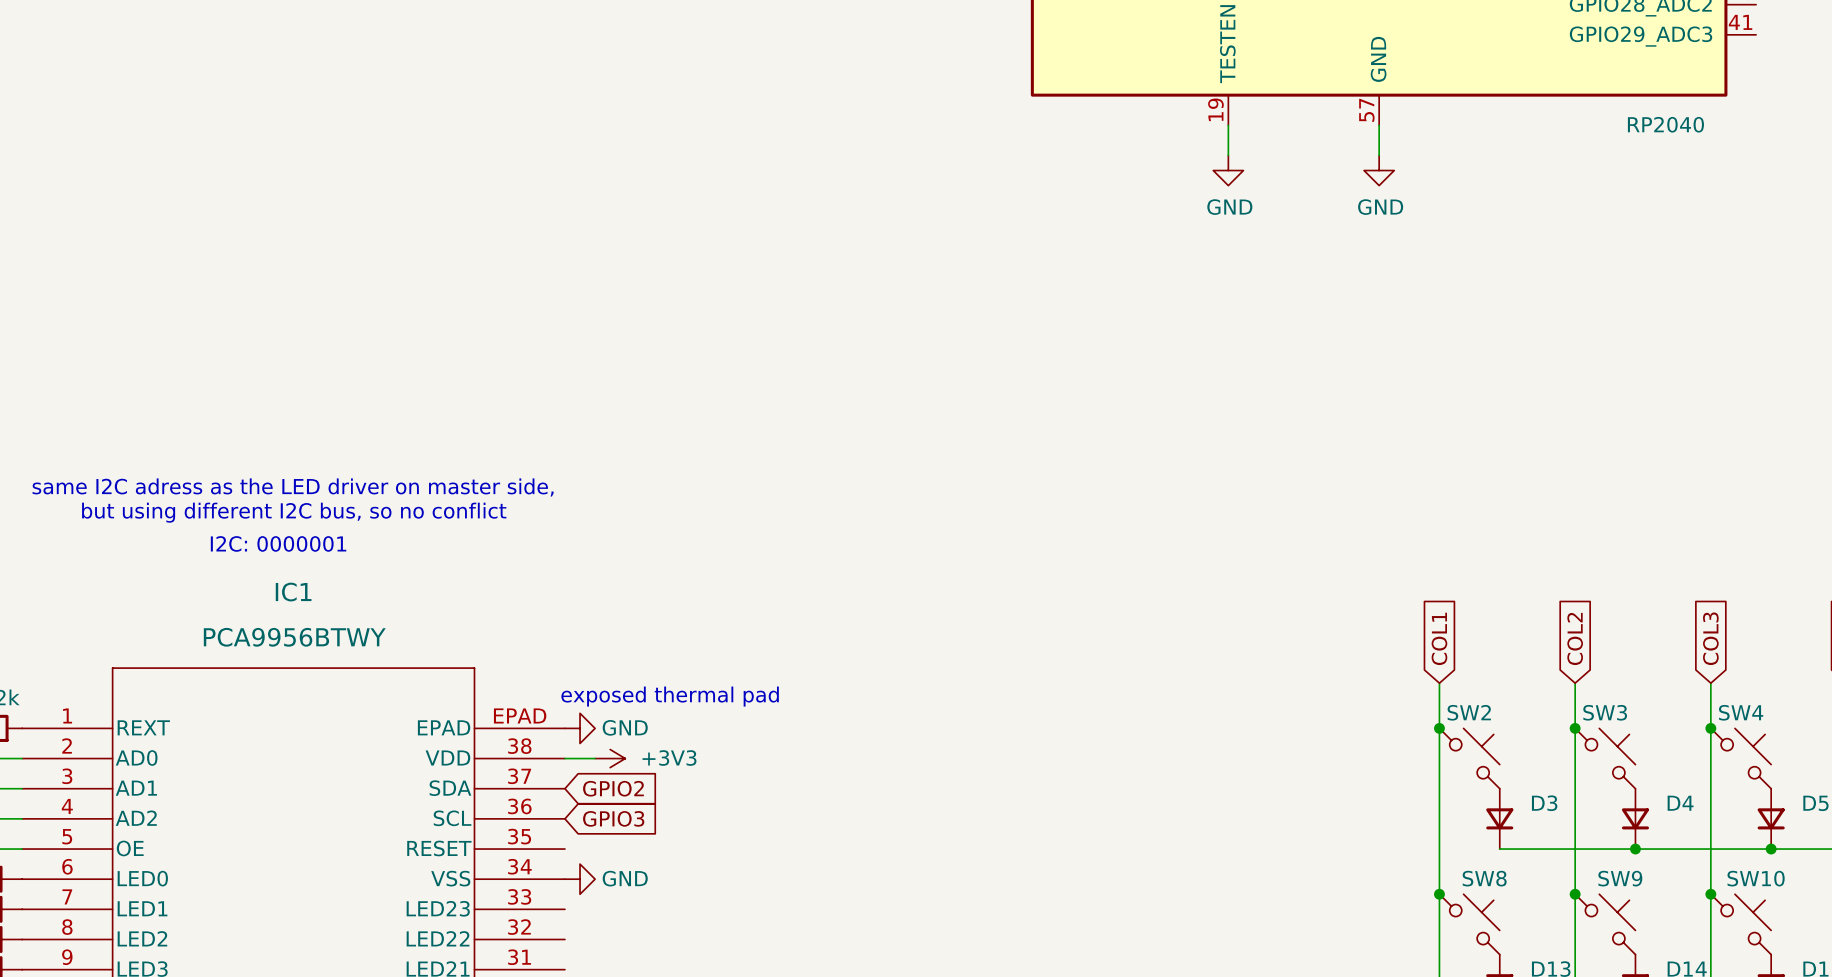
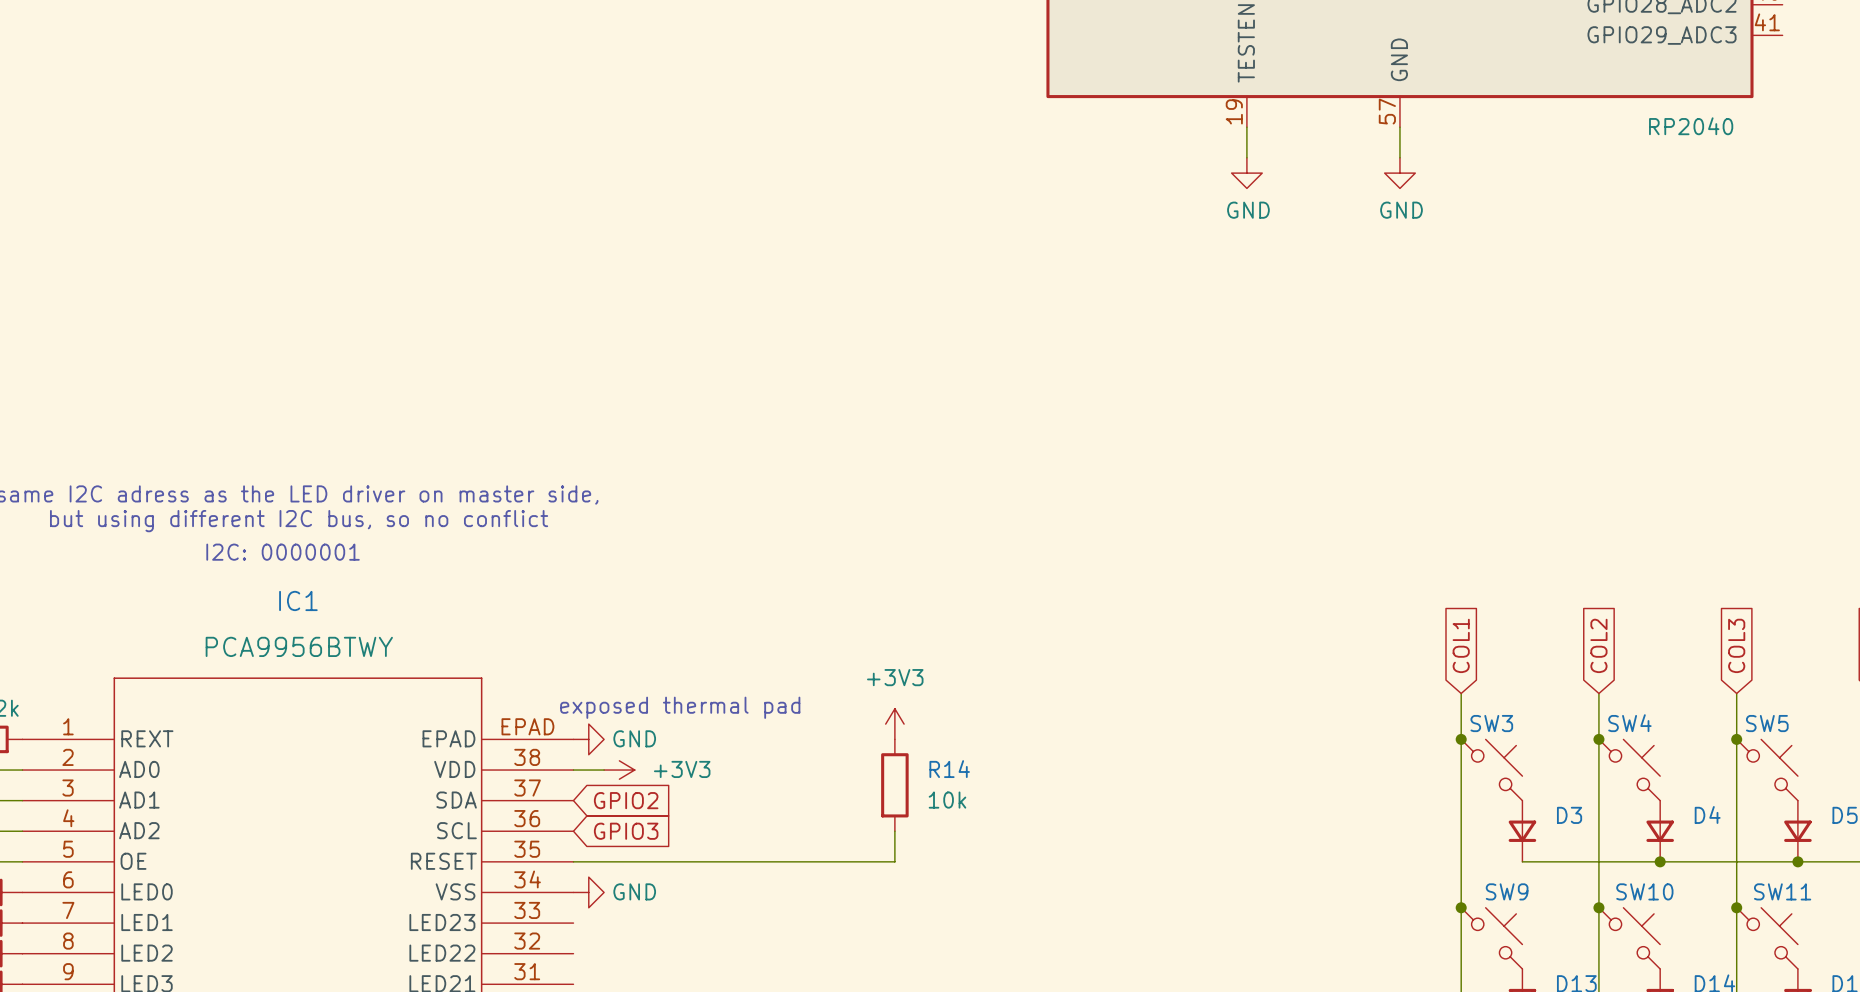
SW2 name: SW2 (1469, 712) -> SW3 (1491, 723)
SW3 name: SW3 (1605, 712) -> SW4 (1629, 723)
SW4 name: SW4 (1741, 712) -> SW5 (1767, 723)
power symbol: none -> +3V3 (894, 724)
R14: none -> 10k (894, 785)
wire: none -> (894, 831) (894, 861) (573, 861)
SW8 name: SW8 (1484, 878) -> SW9 (1507, 891)
SW9 name: SW9 (1620, 878) -> SW10 (1644, 891)
SW10 name: SW10 (1756, 878) -> SW11 (1782, 891)

